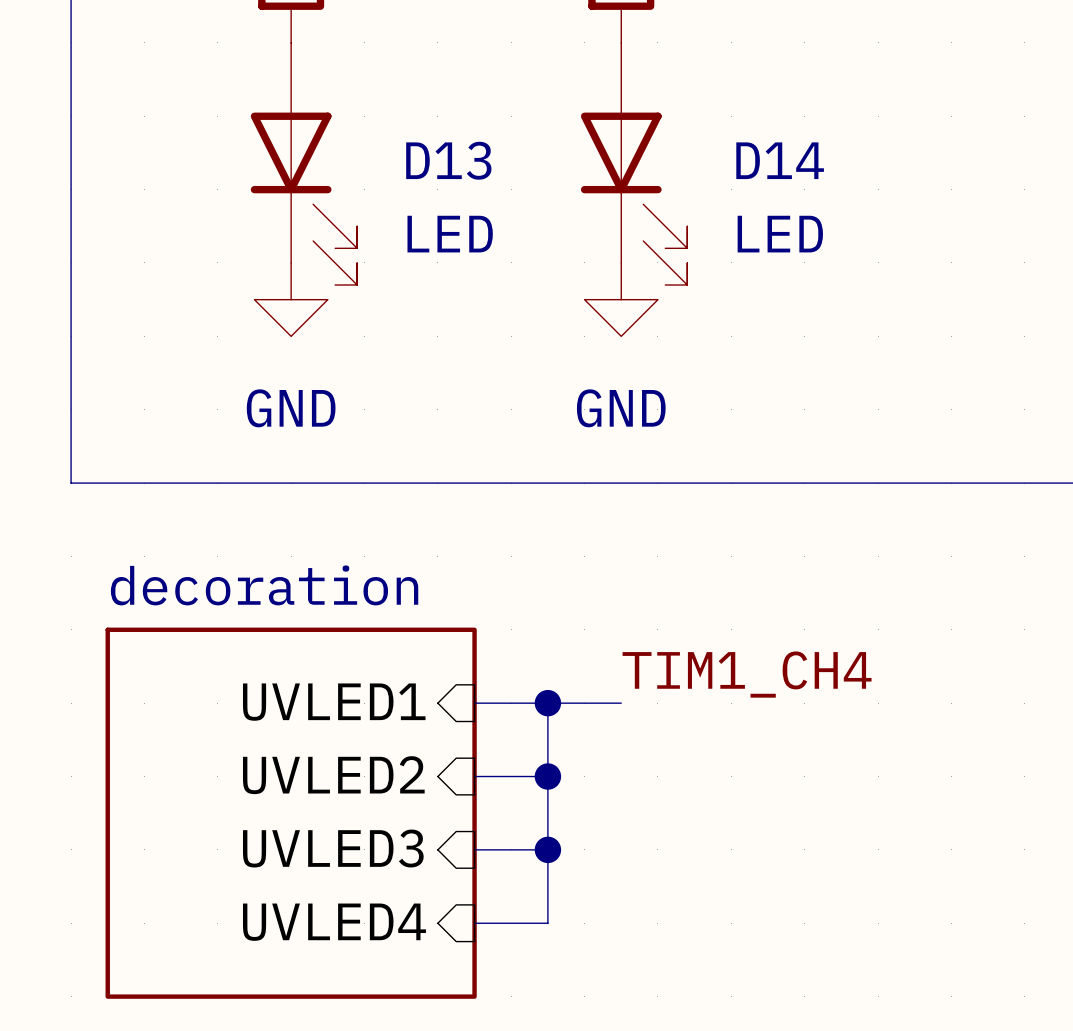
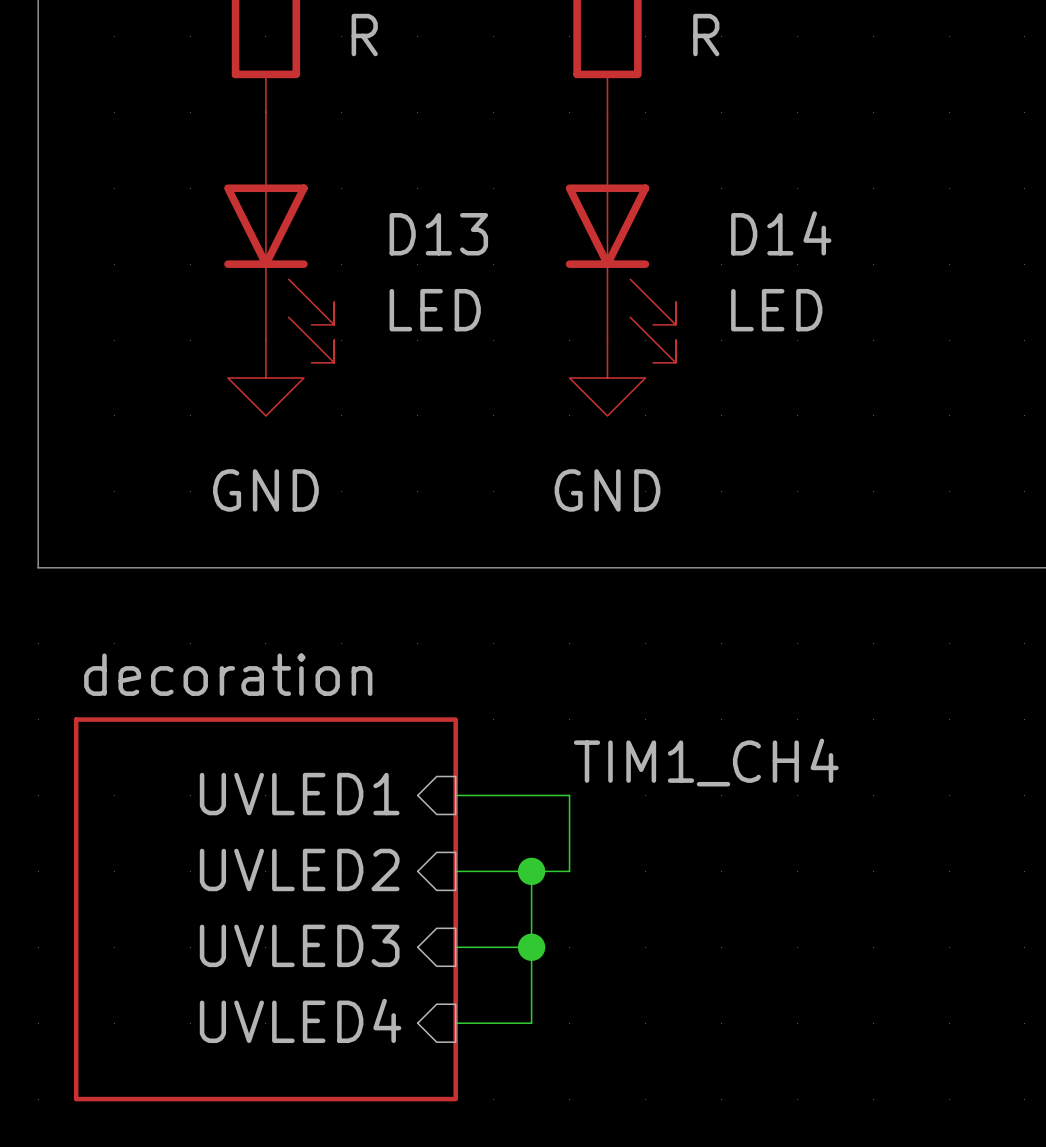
label position: TIM1_CH4 (747, 674) -> TIM1_CH4 (706, 762)
wire: (547, 703) (547, 776) -> (569, 795) (569, 871) (531, 871)
junction: (547, 703) -> none
wire: (584, 703) (621, 703) -> none

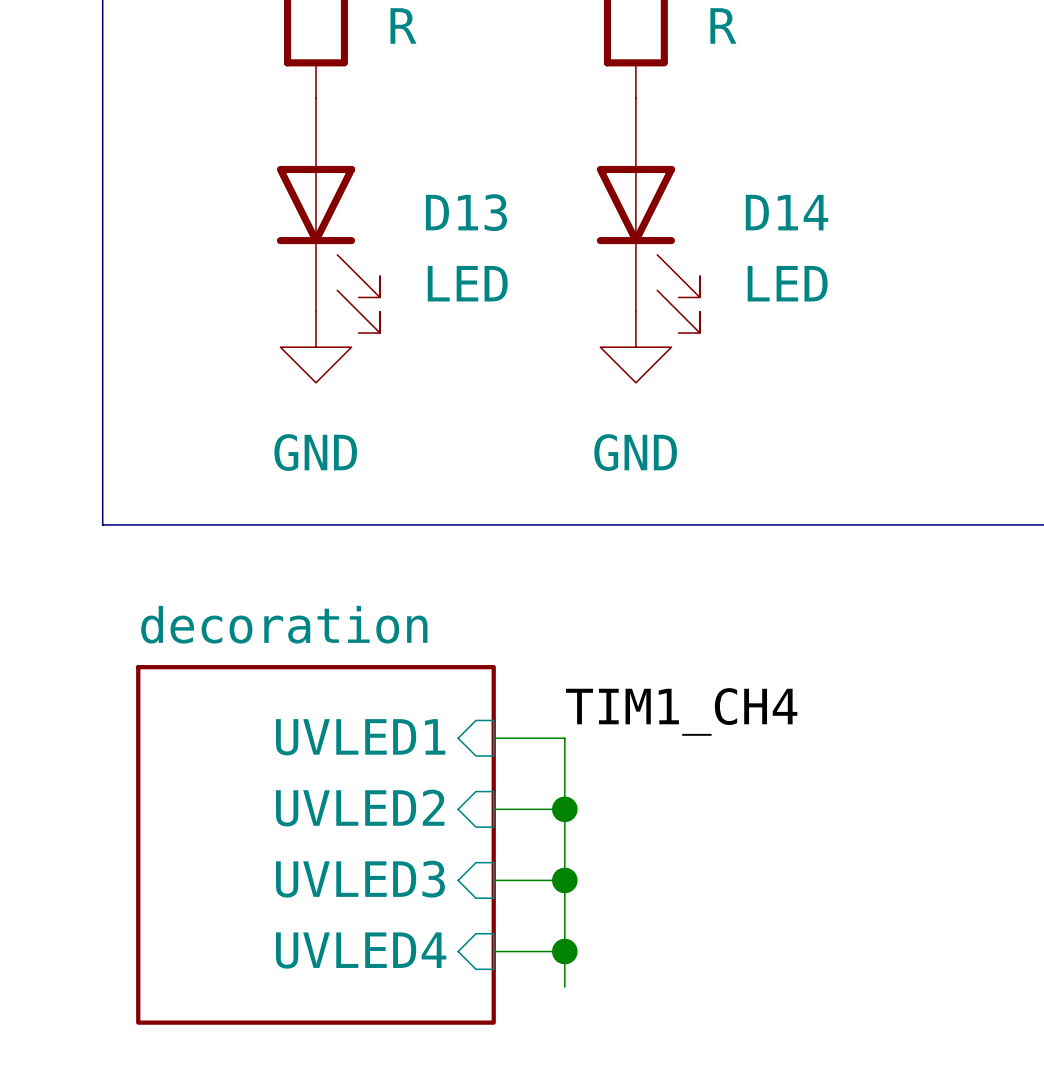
label position: TIM1_CH4 (706, 762) -> TIM1_CH4 (681, 711)
wire: (531, 795) (569, 795) (569, 871) (531, 871) -> (564, 738) (564, 809)
wire: none -> (564, 951) (564, 987)
junction: none -> (564, 951)

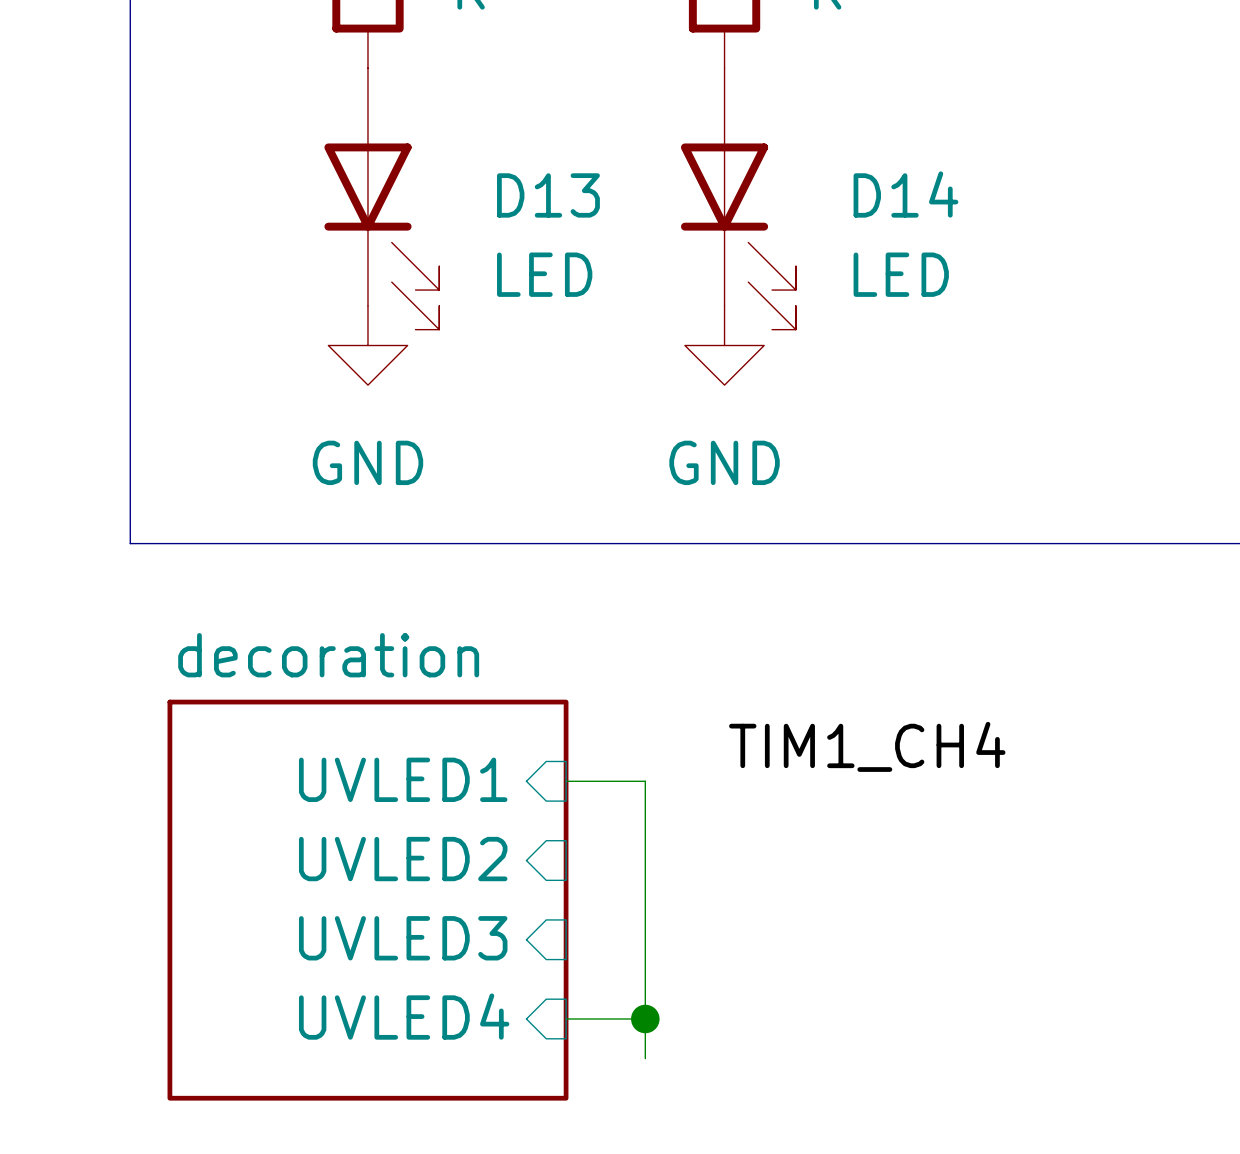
label position: TIM1_CH4 (681, 711) -> TIM1_CH4 (867, 746)
wire: (493, 809) (564, 809) -> none
junction: (564, 809) -> none
wire: (493, 880) (564, 880) -> none
junction: (564, 880) -> none

